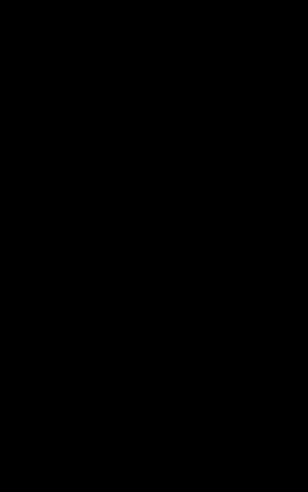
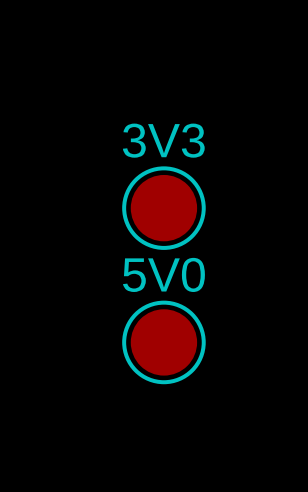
3V3: none -> (163, 208)
5V0: none -> (163, 342)

